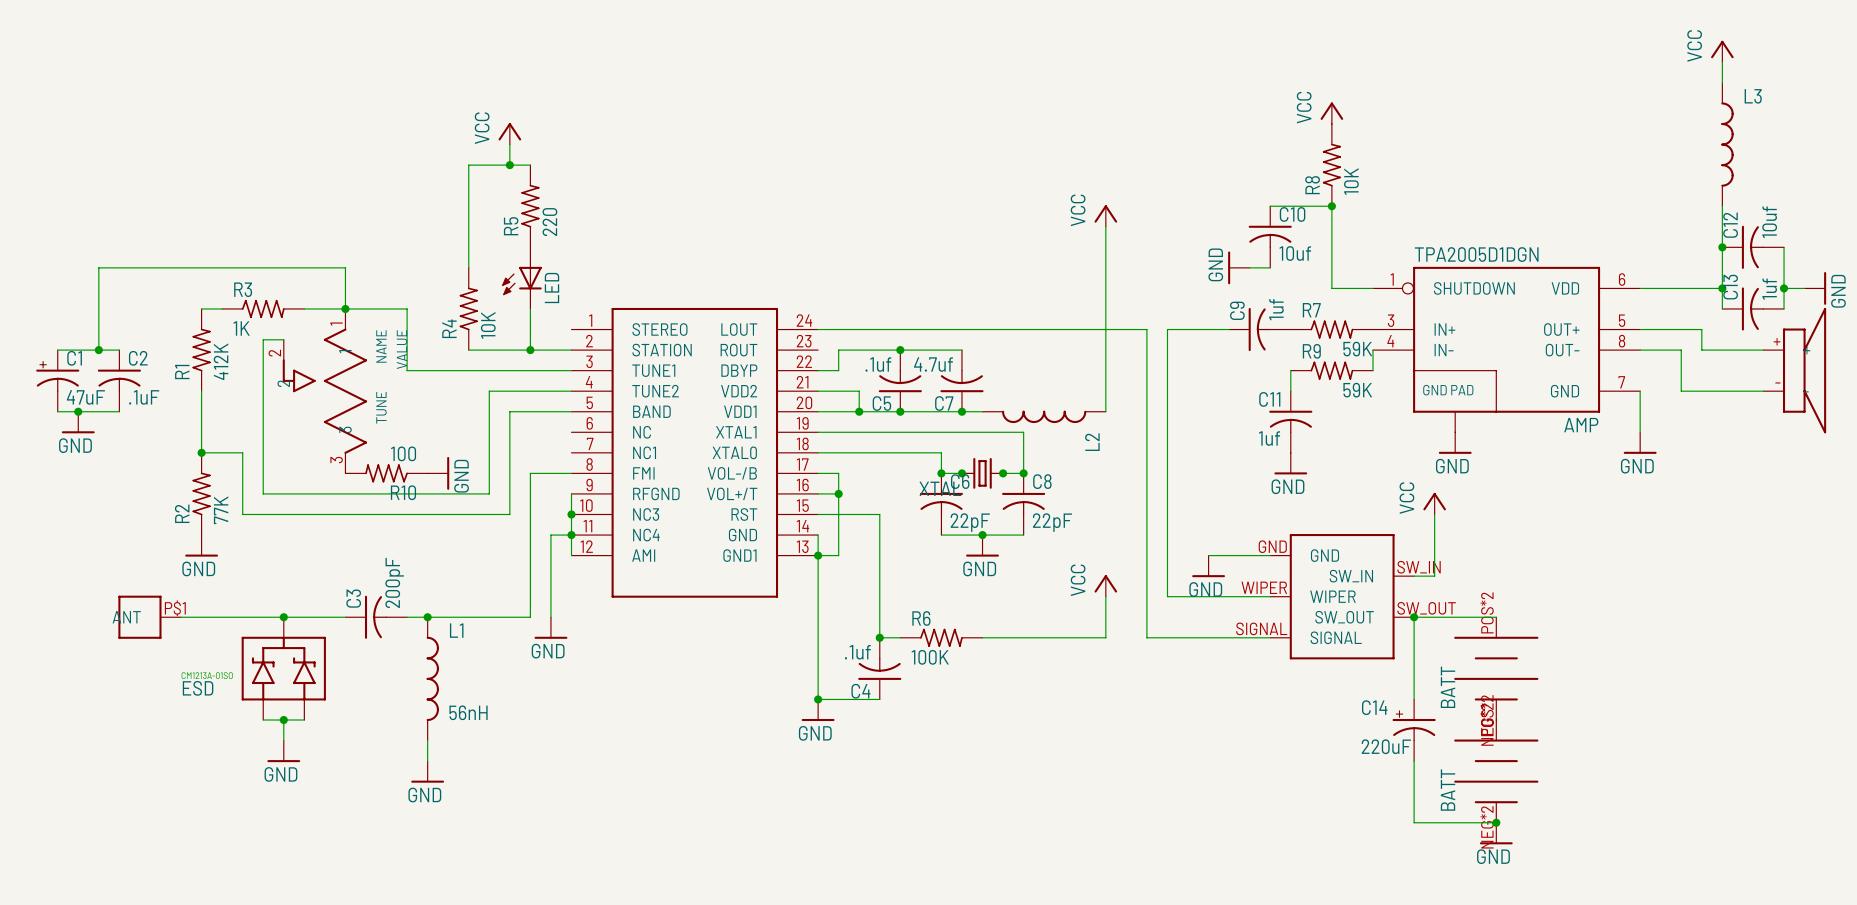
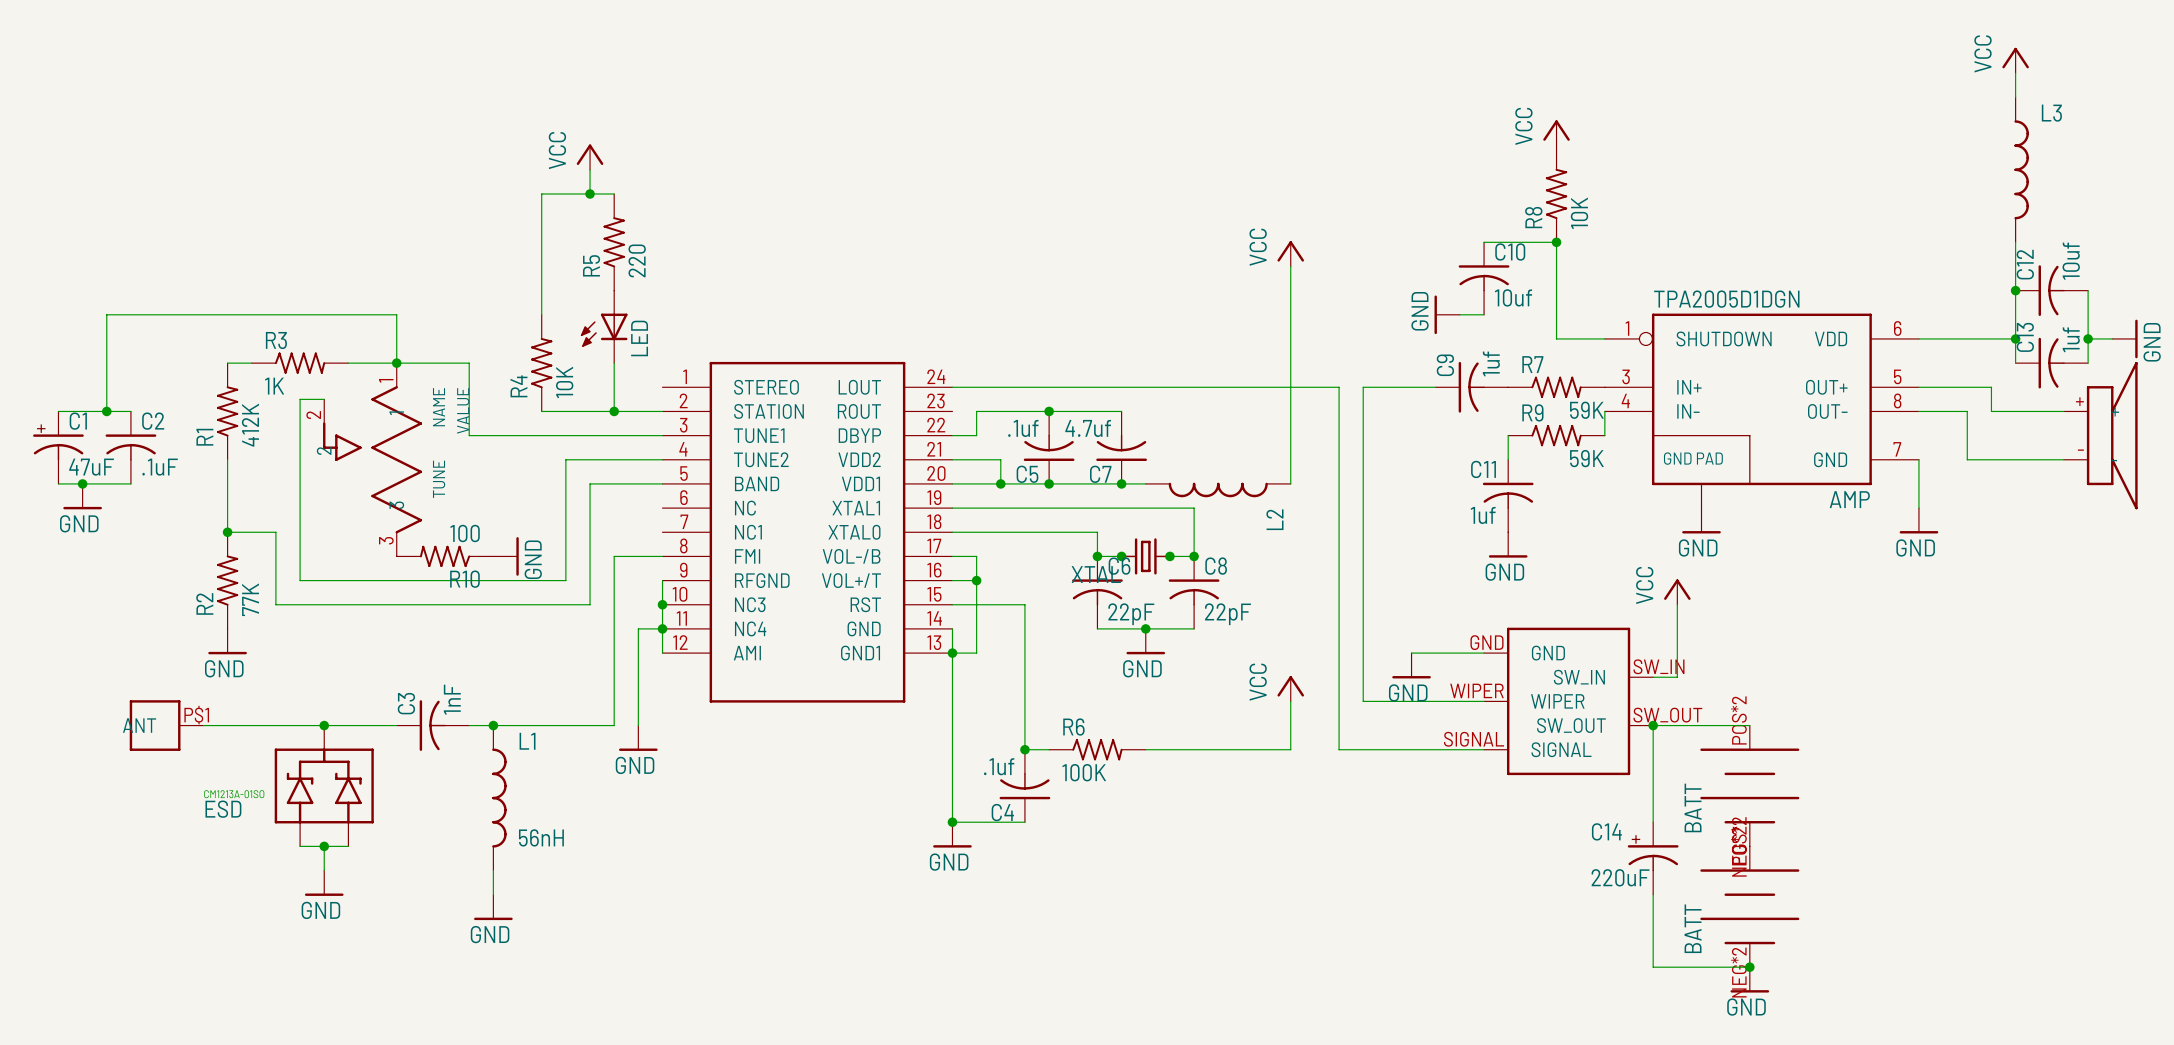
C3 value: 200pF (394, 582) -> 1nF (452, 699)

